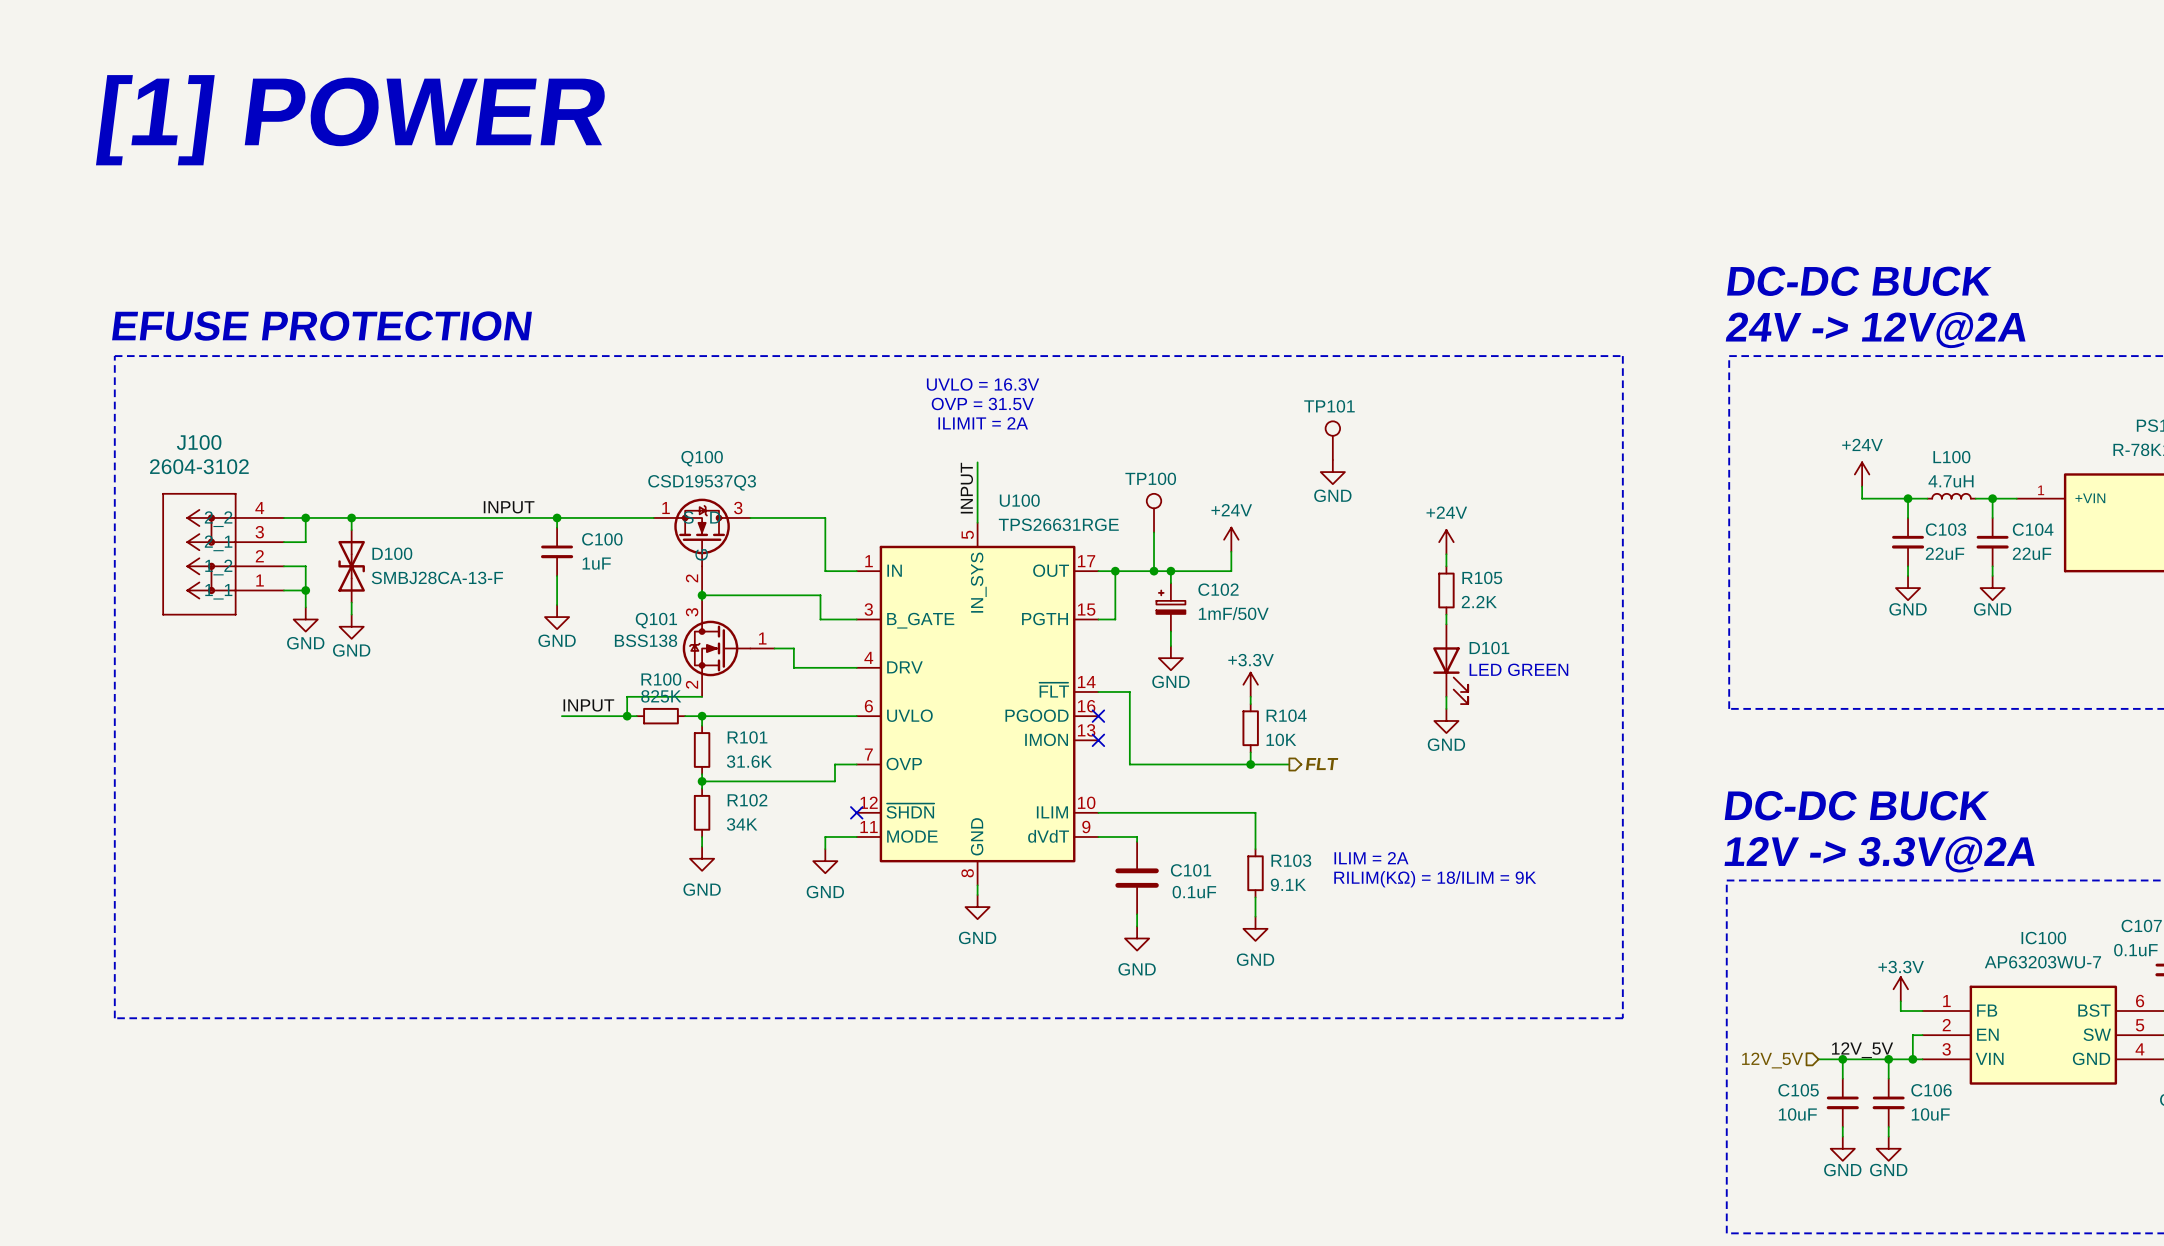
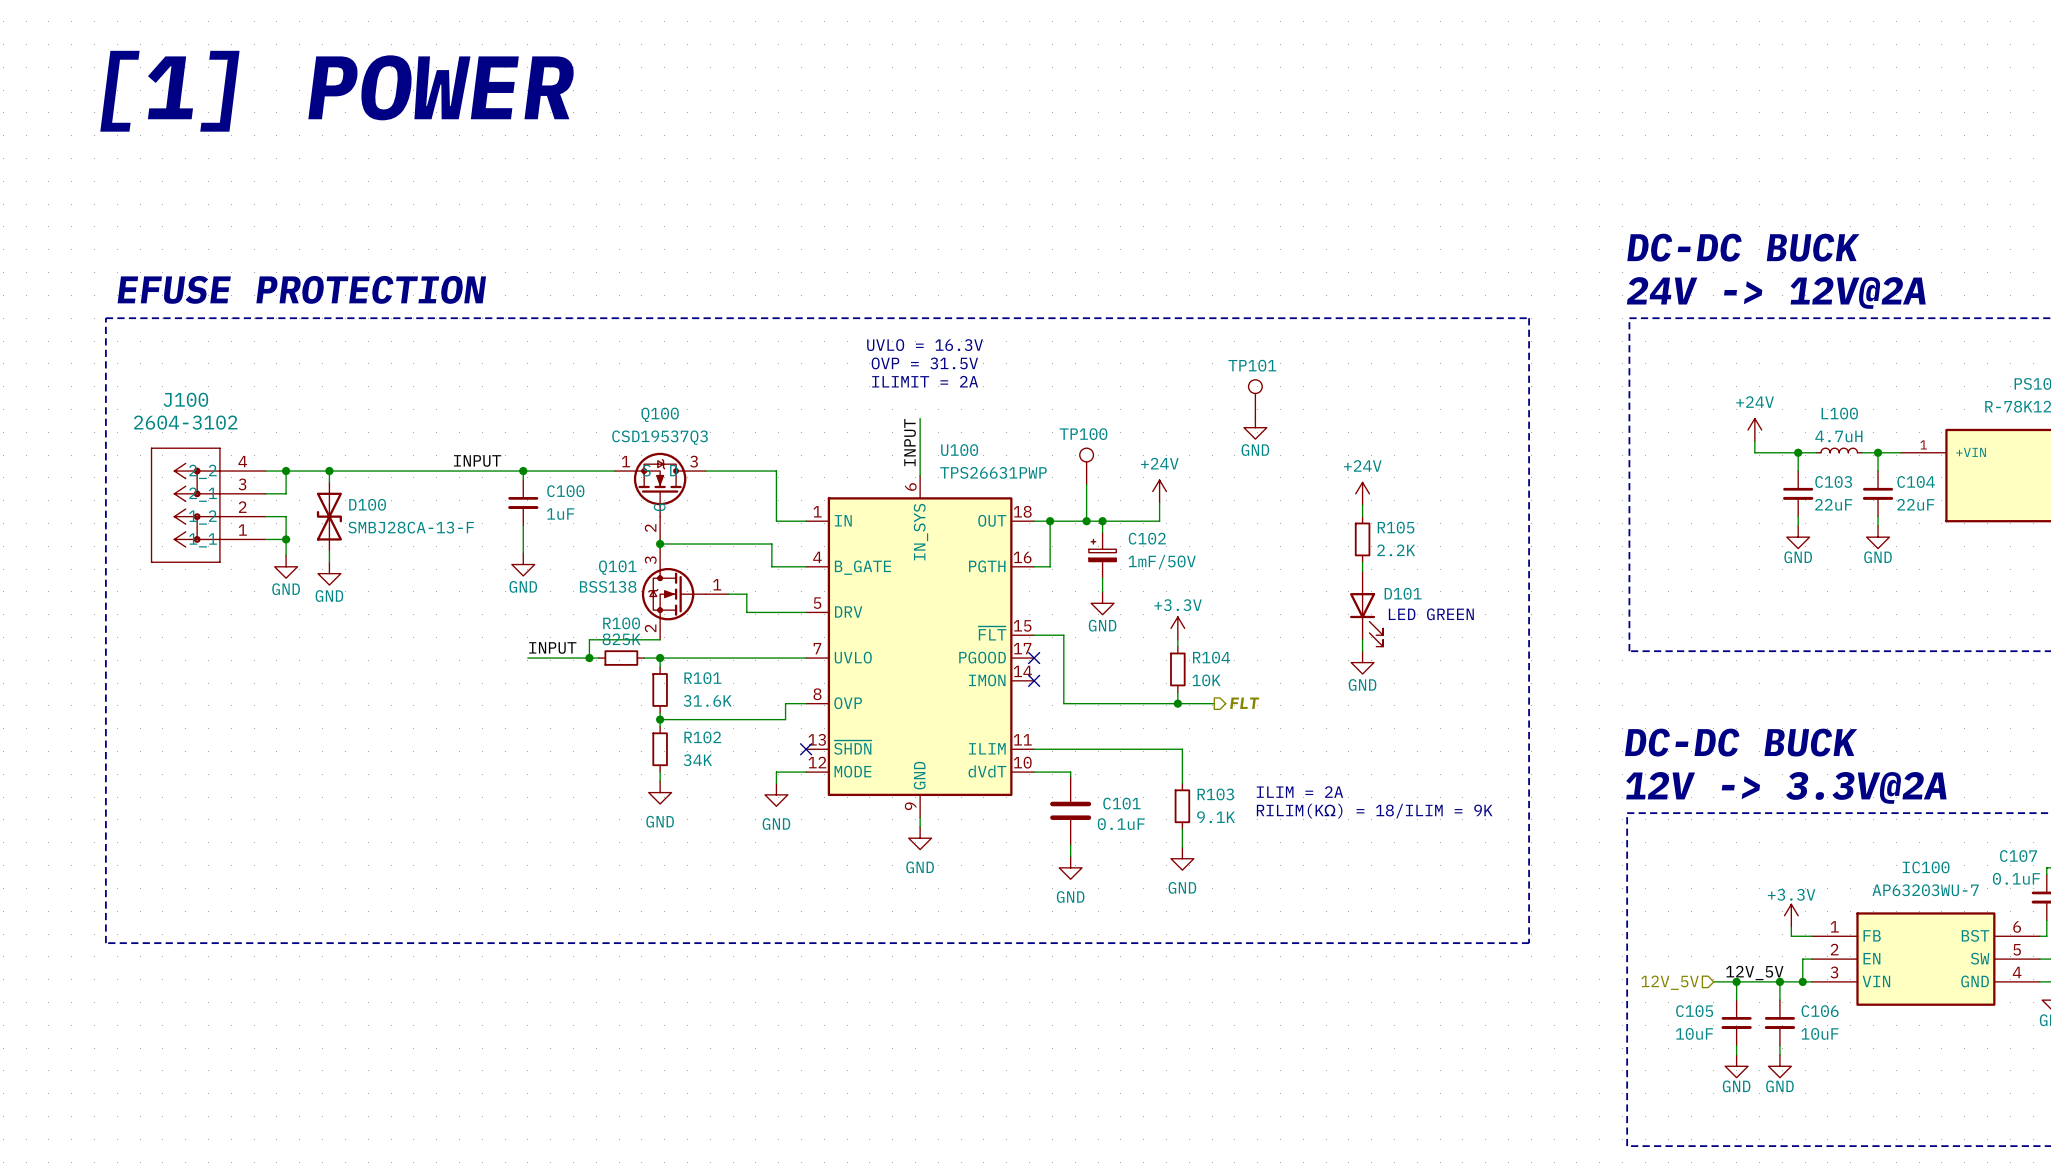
U100 symbol: [856, 522, 1099, 886] -> [806, 475, 1035, 818]
U100 value: TPS26631RGE (1058, 524) -> TPS26631PWP (993, 472)

